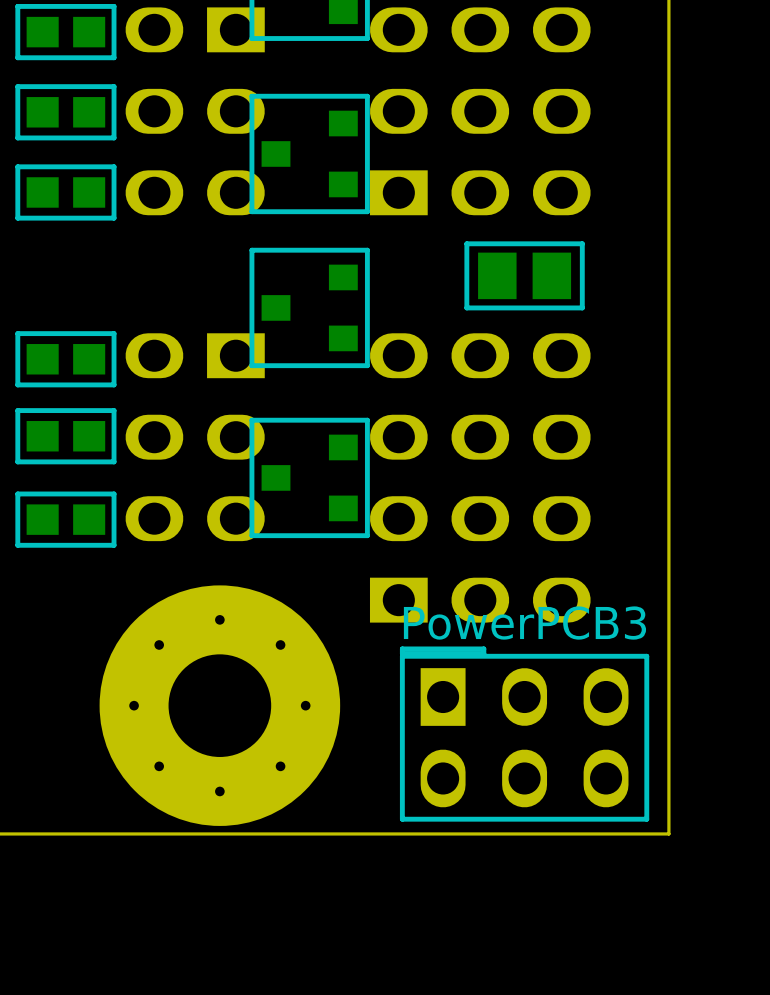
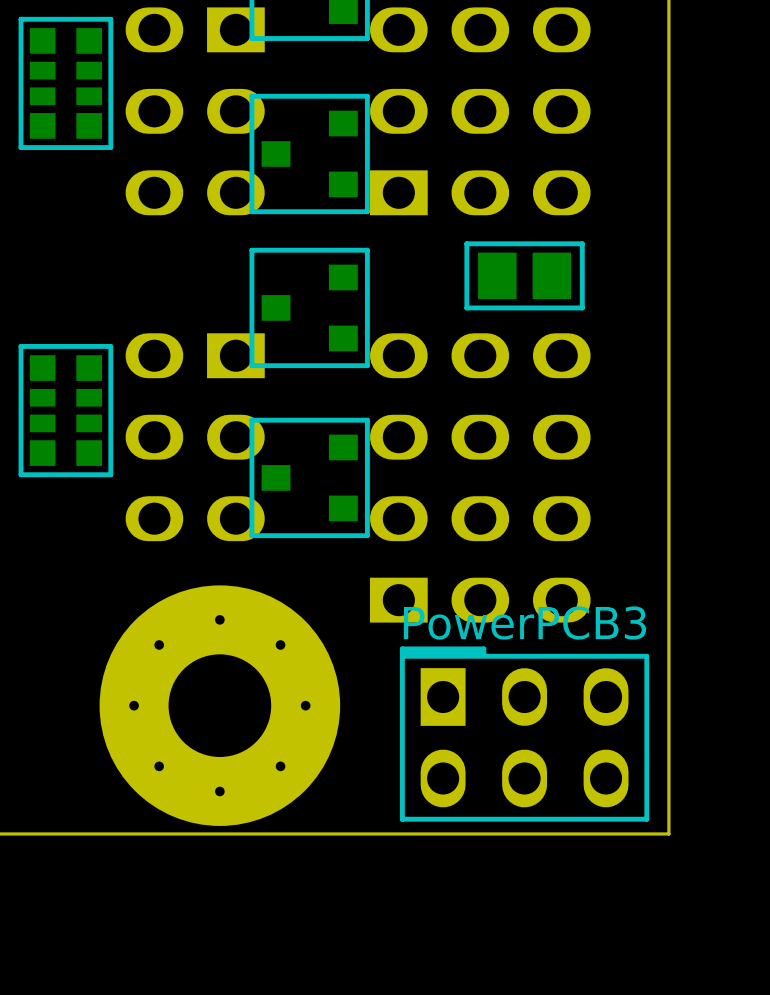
part: (65, 32) -> none
part: none -> (65, 83)
part: (65, 112) -> none
part: (65, 192) -> none
part: (65, 359) -> none
part: none -> (65, 410)
part: (65, 436) -> none
part: (65, 519) -> none

